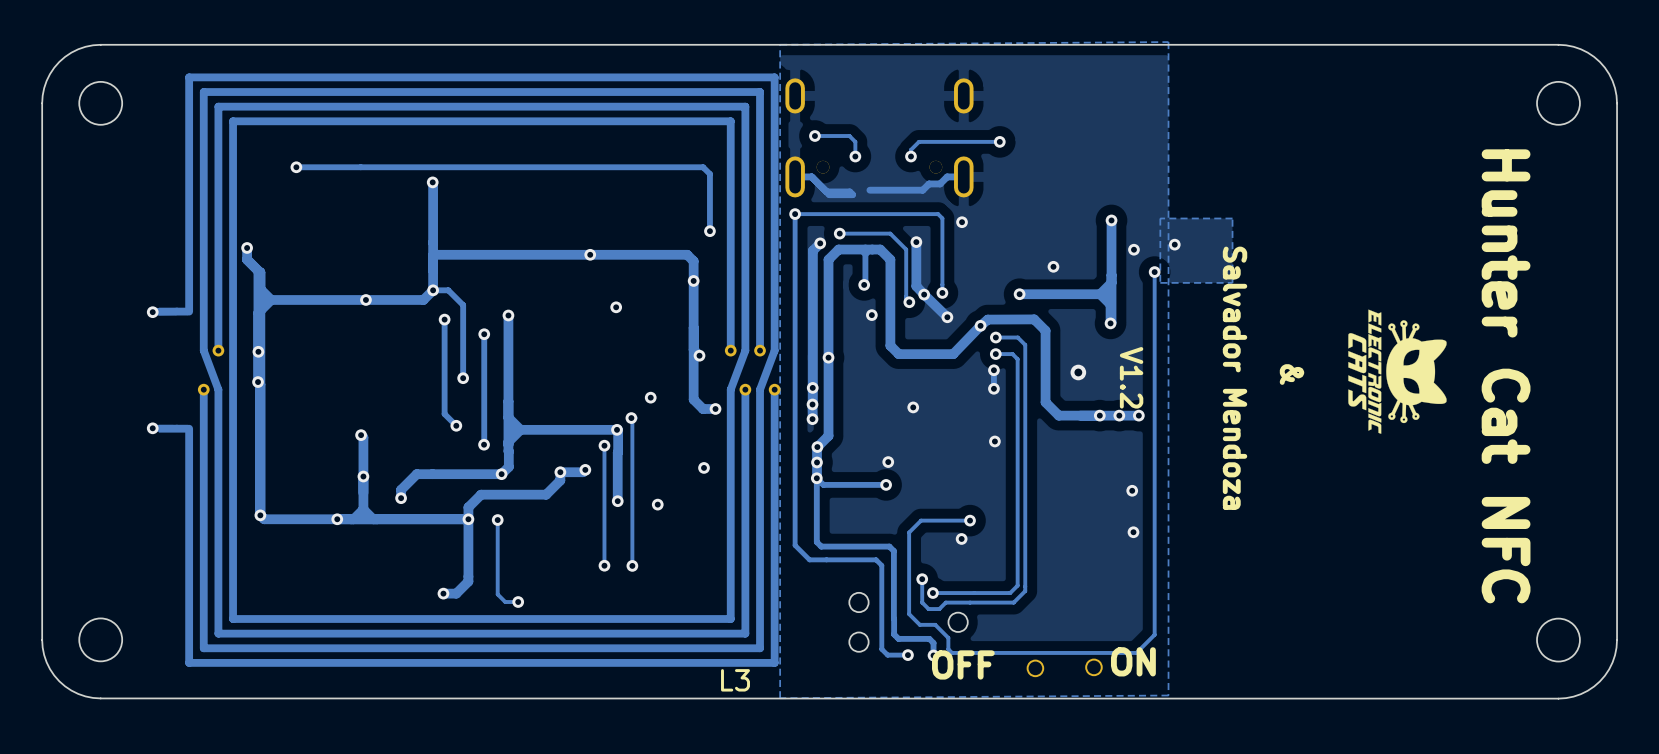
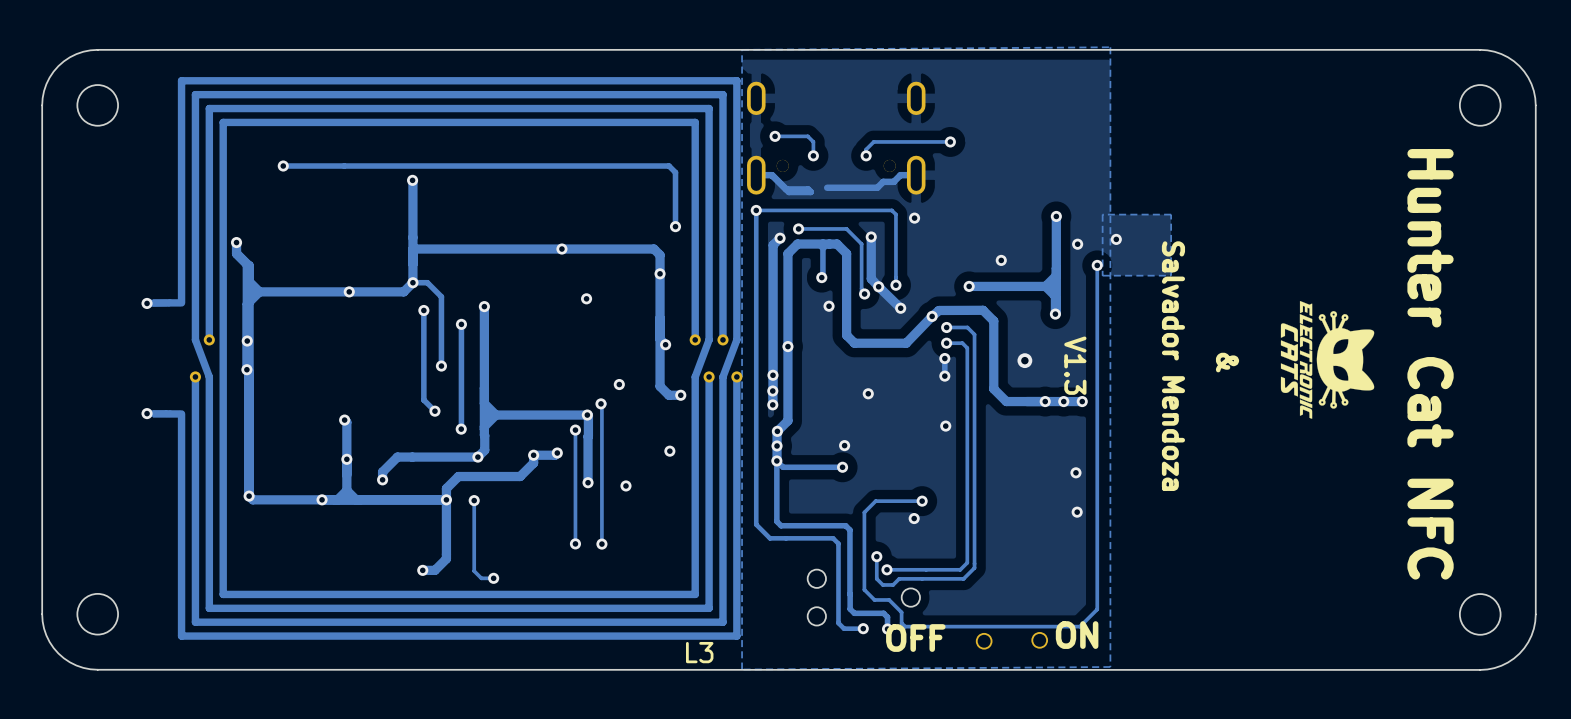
text: V1.2 (1131, 377) -> V1.3 (1075, 365)

